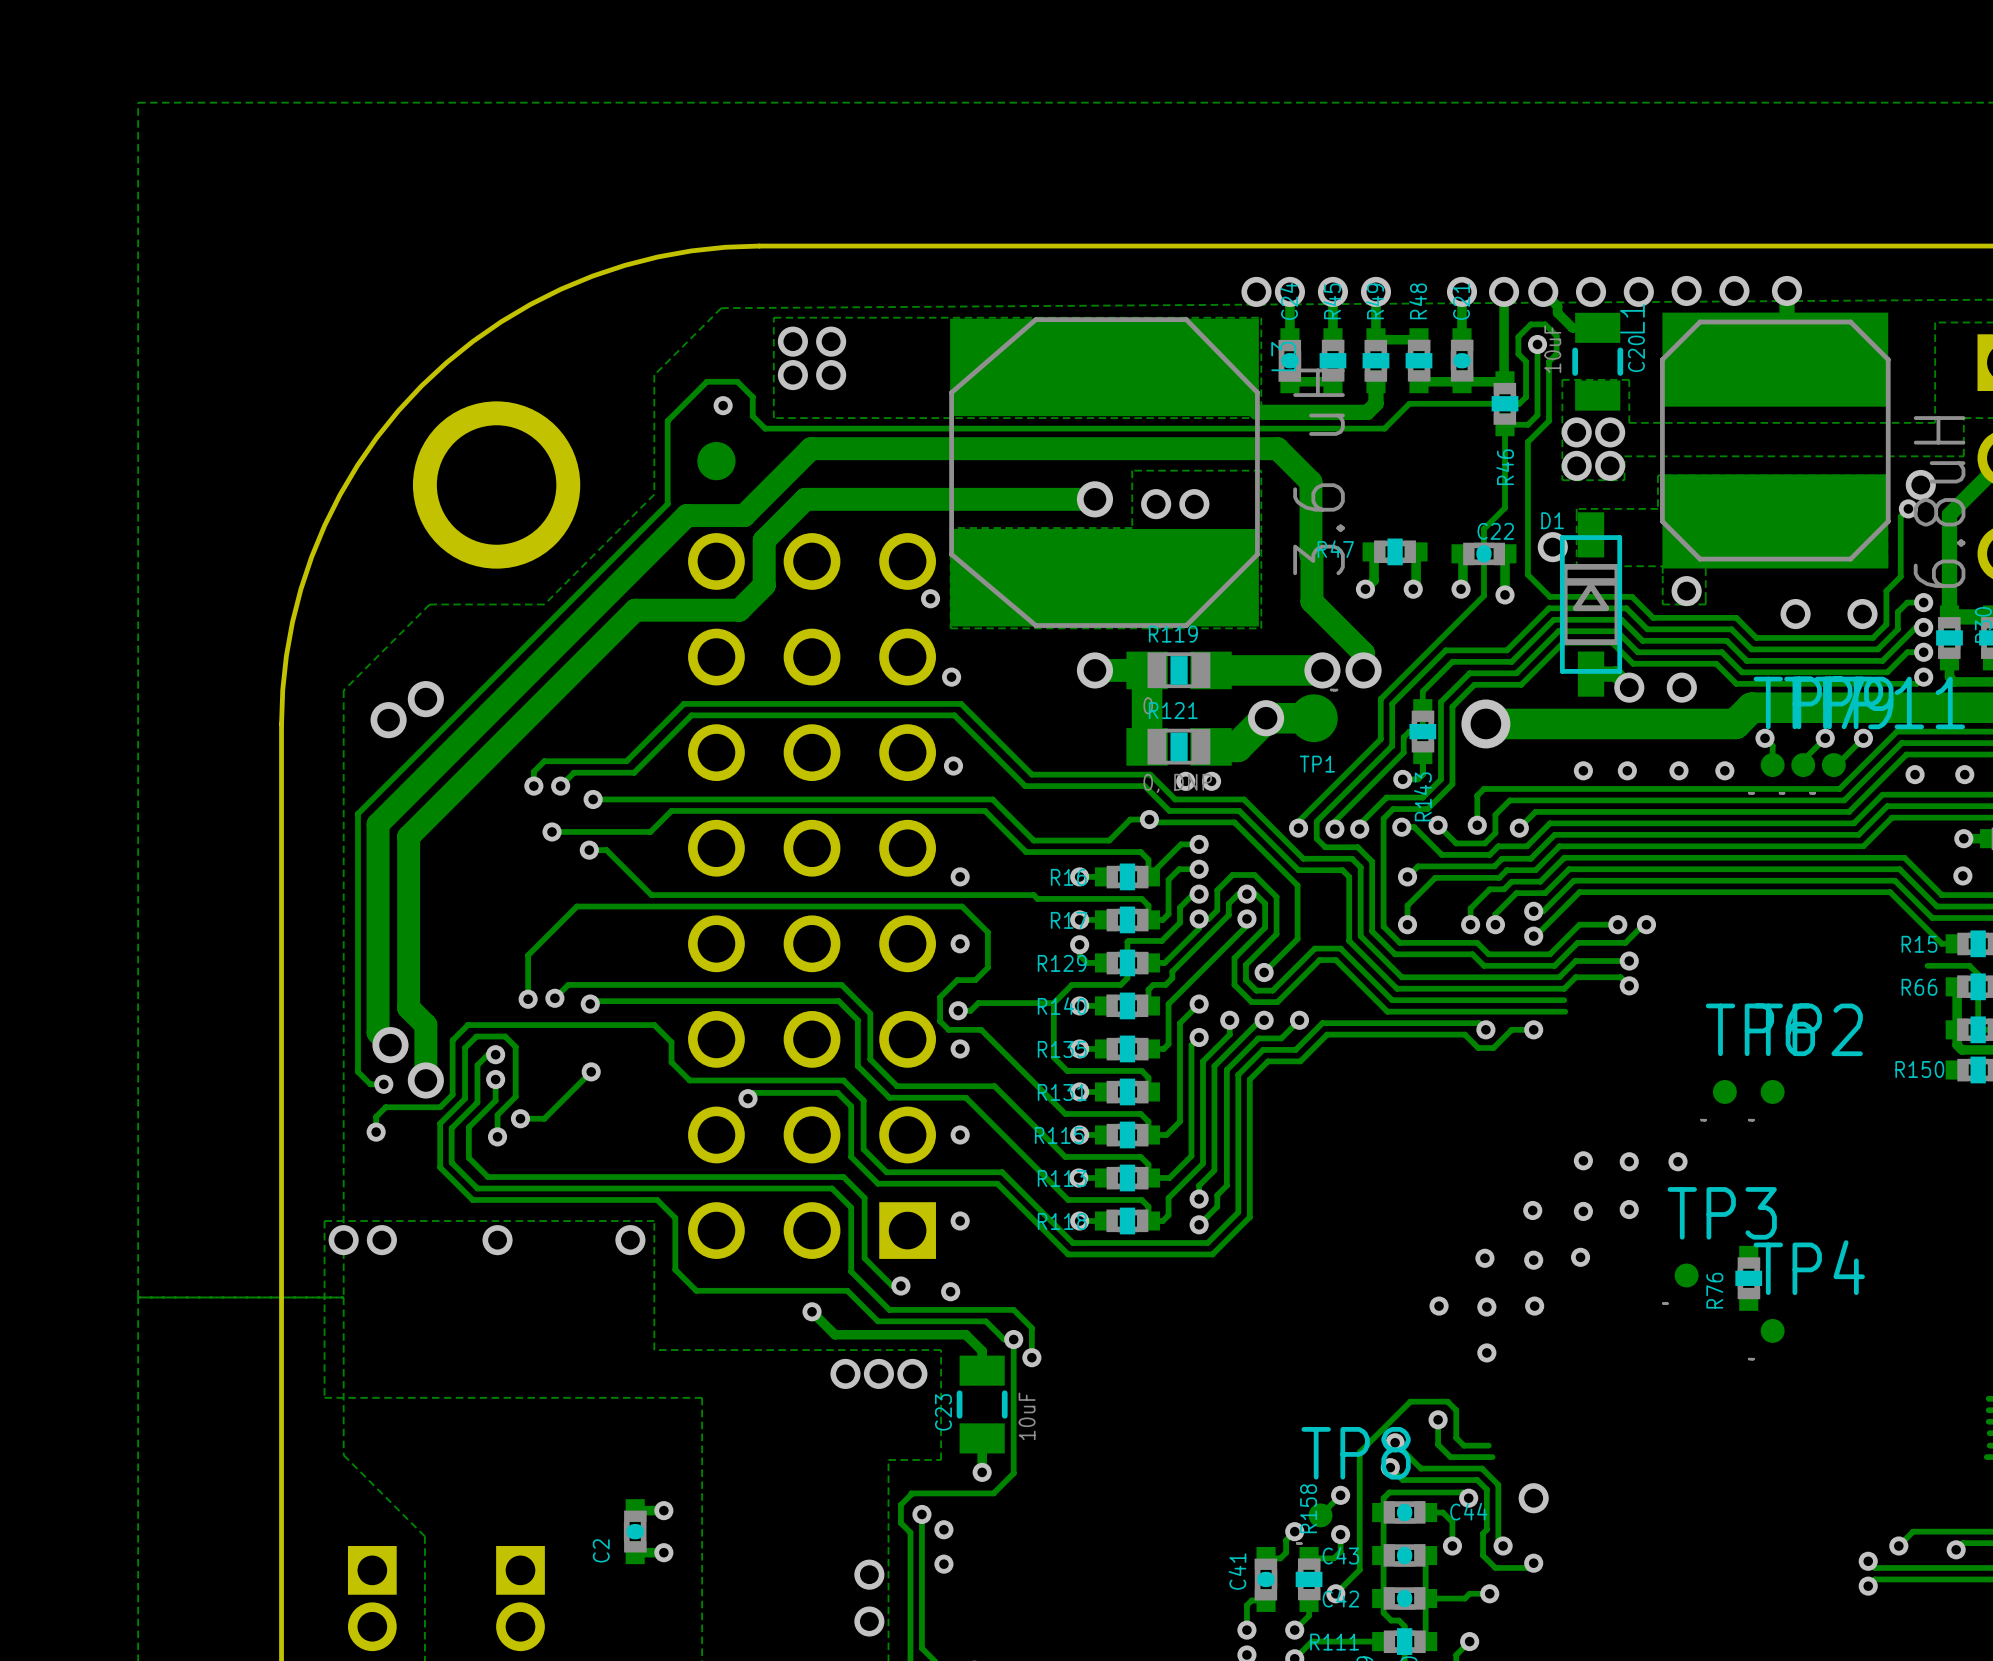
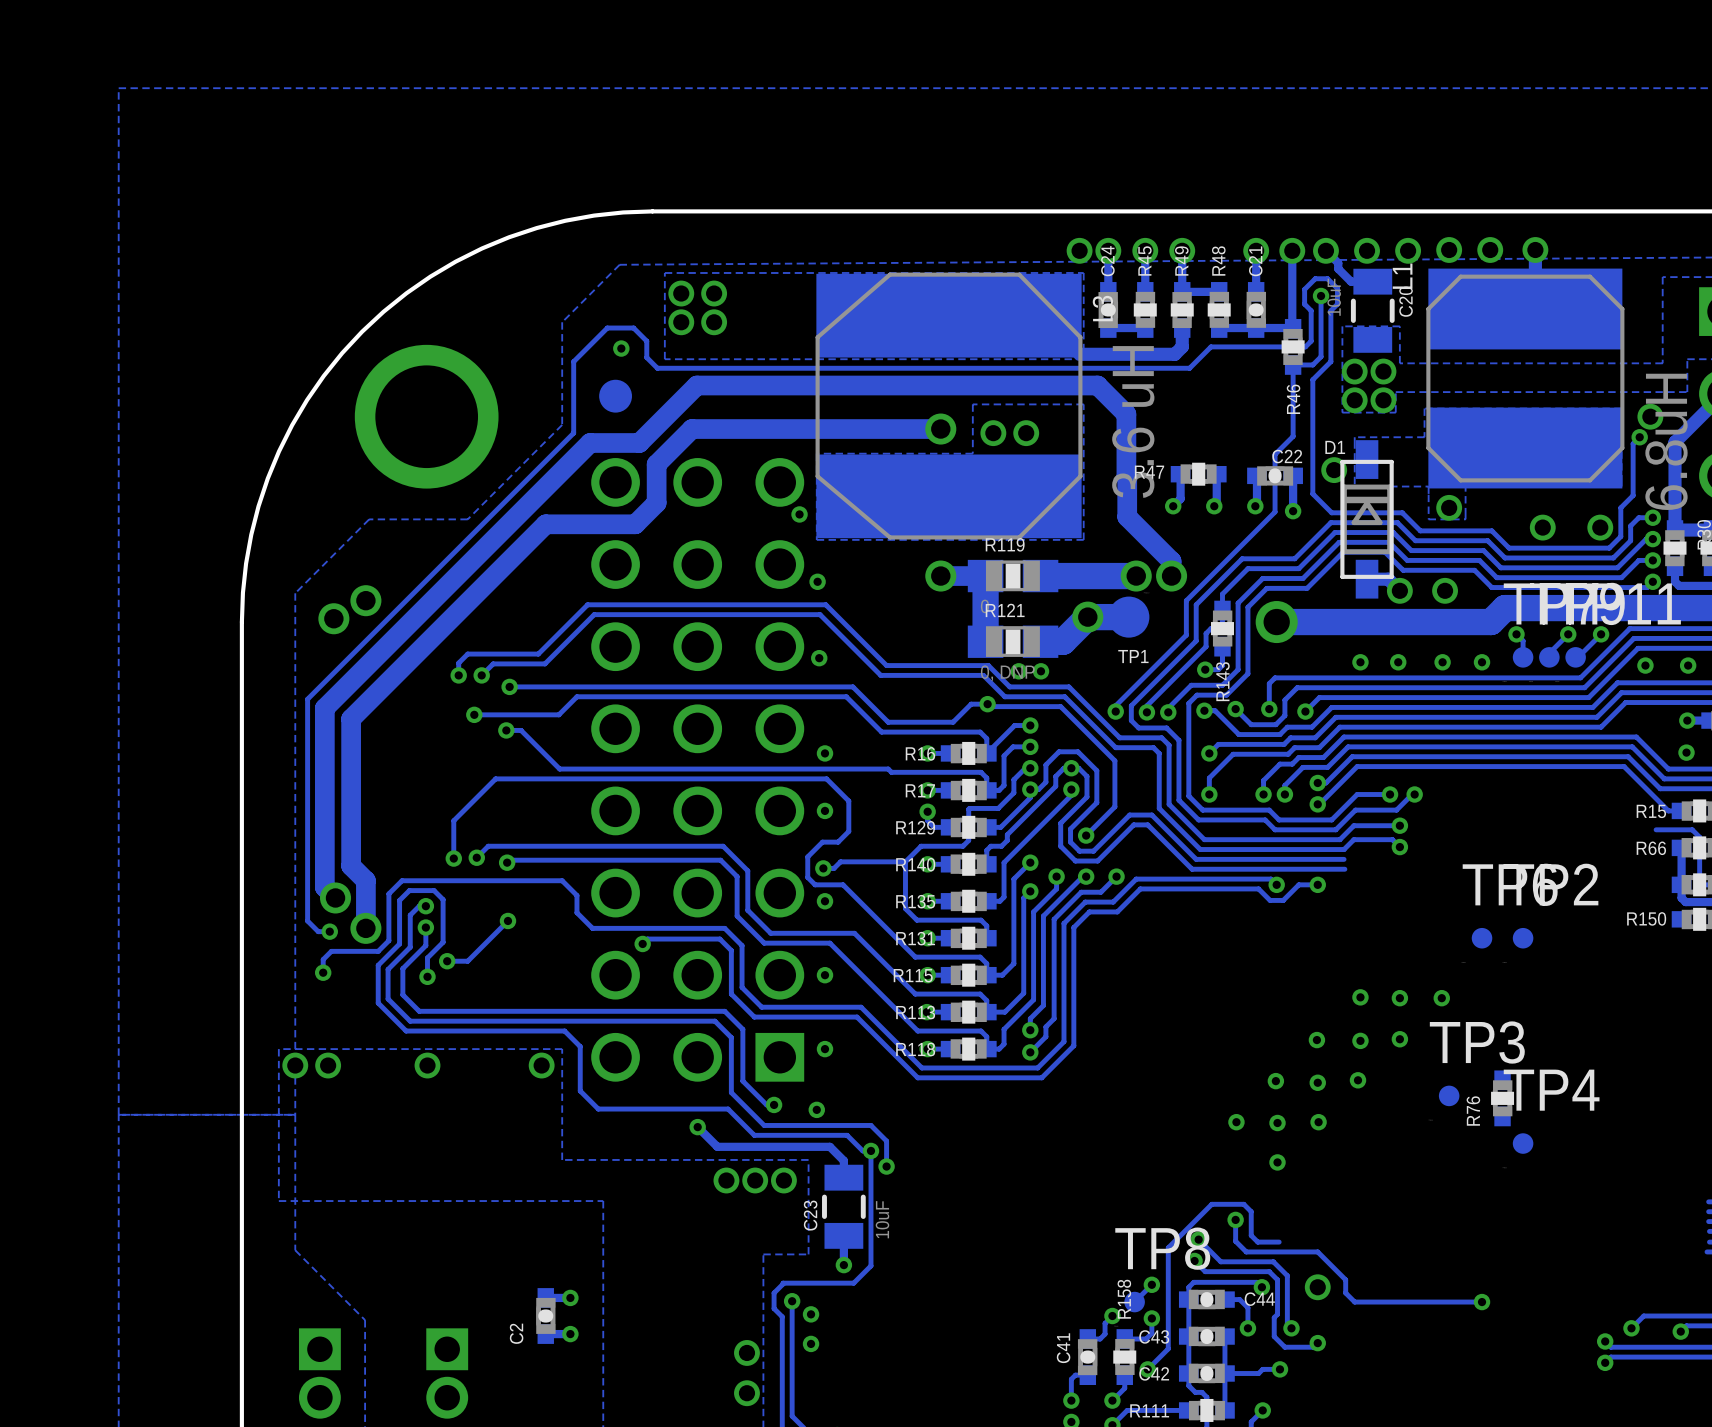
track: none -> (1282, 1251) (1317, 1251) (1345, 1279) (1345, 1293) (1354, 1302) (1482, 1302)
via: none -> (1482, 1302)

